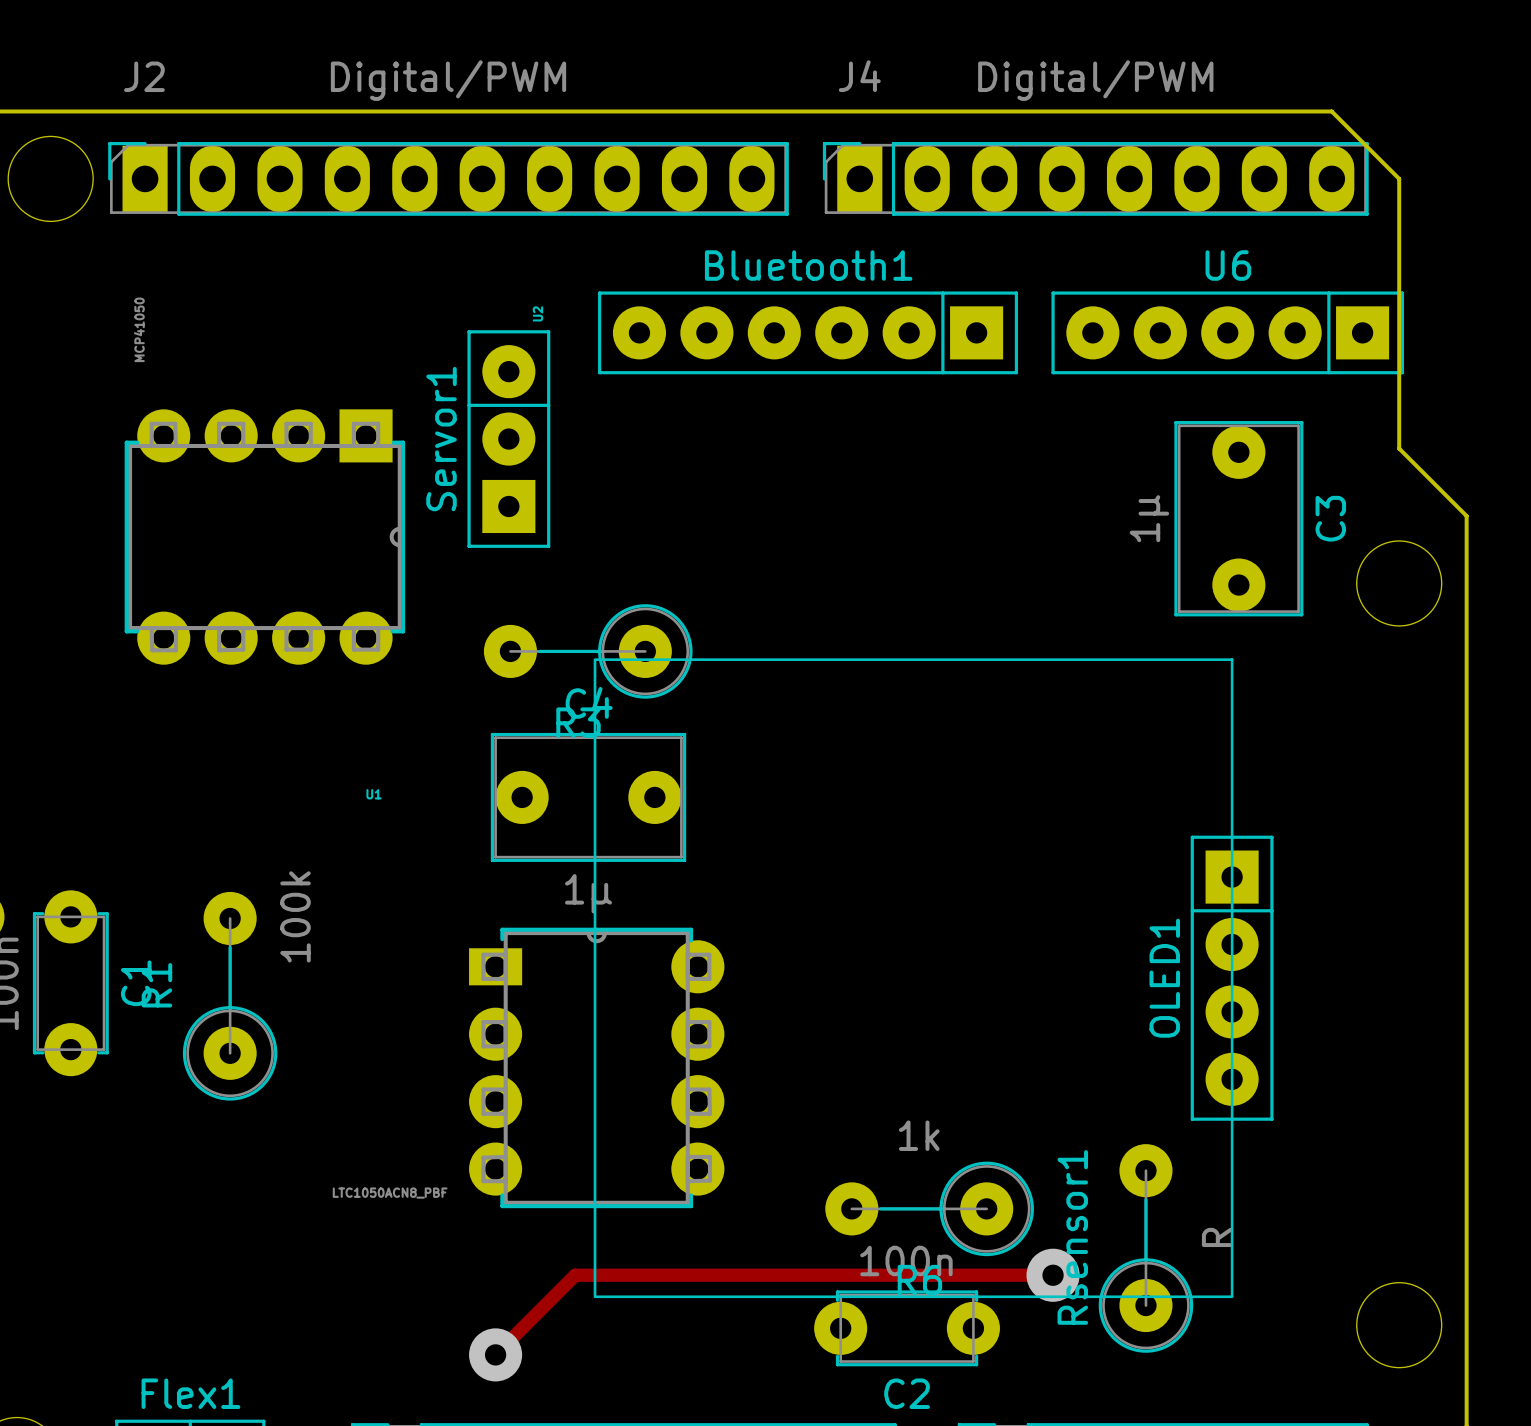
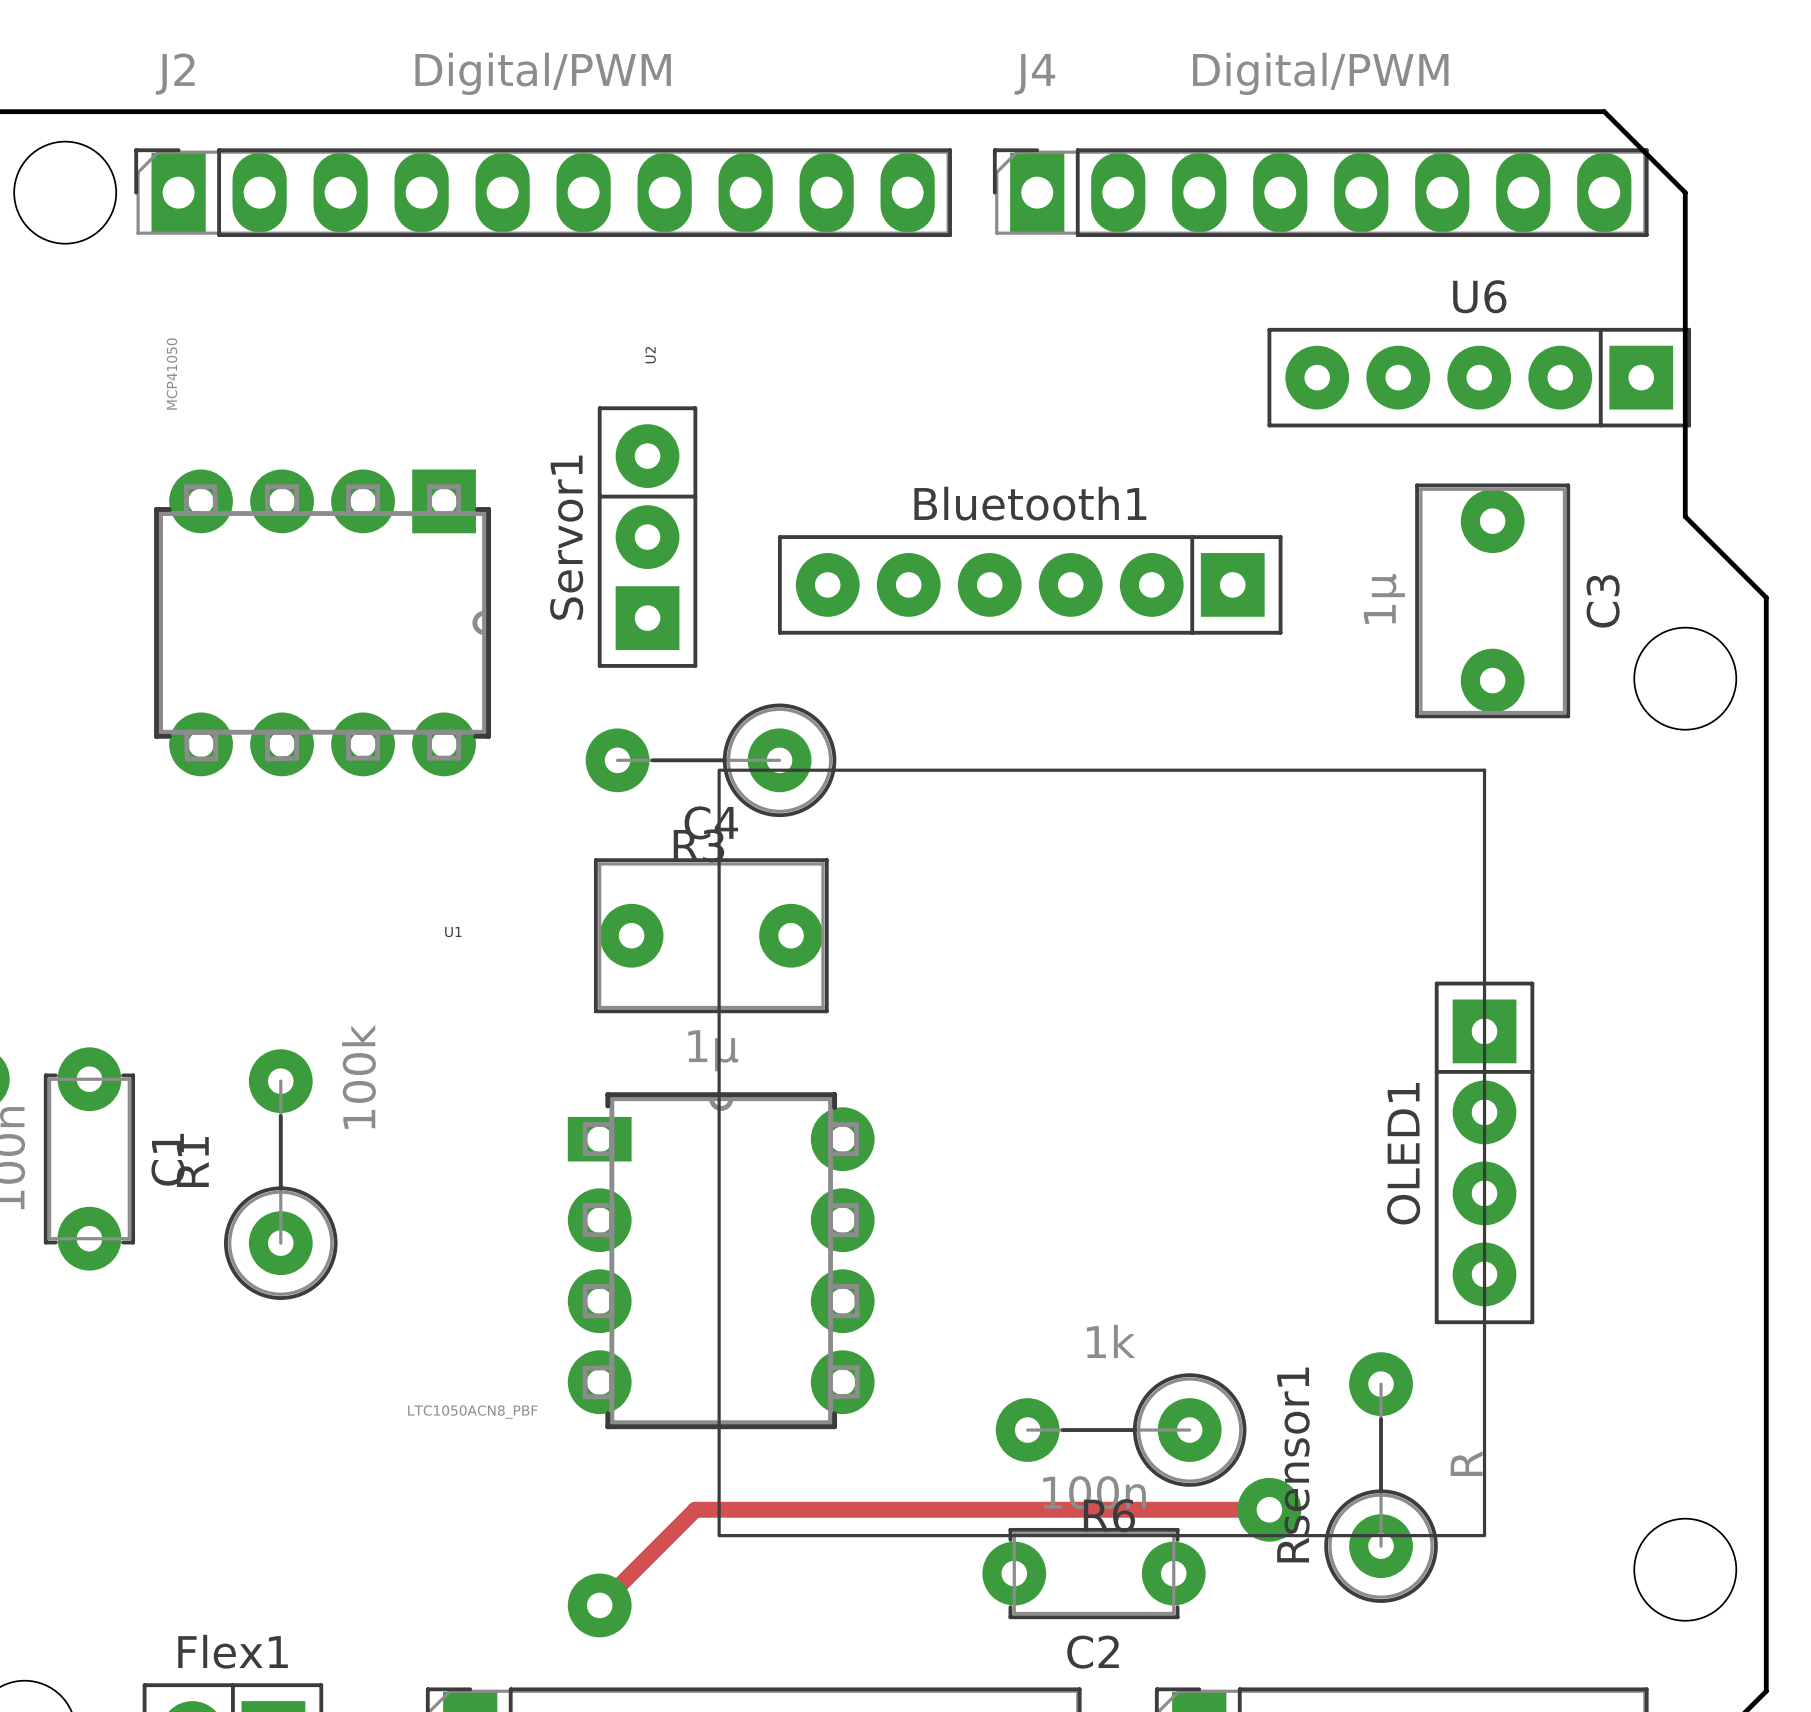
Bluetooth1 position: (808, 332) -> (1030, 584)
Servor1 position: (508, 439) -> (647, 537)

